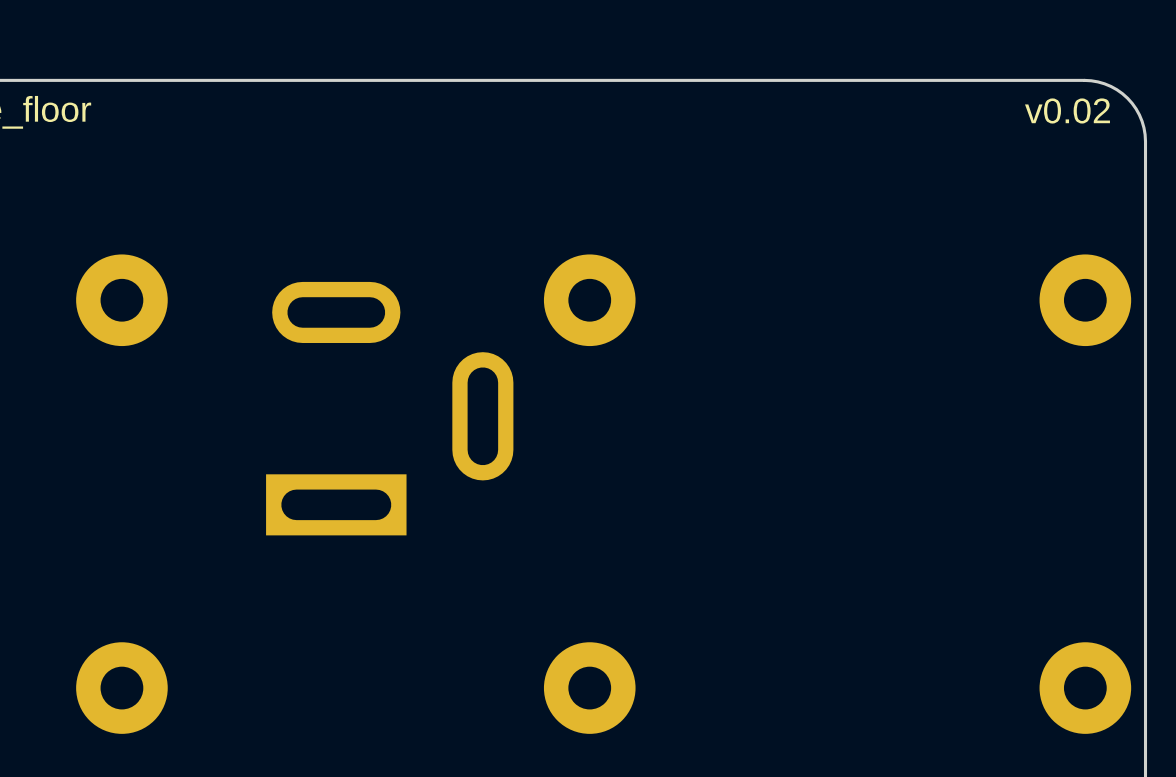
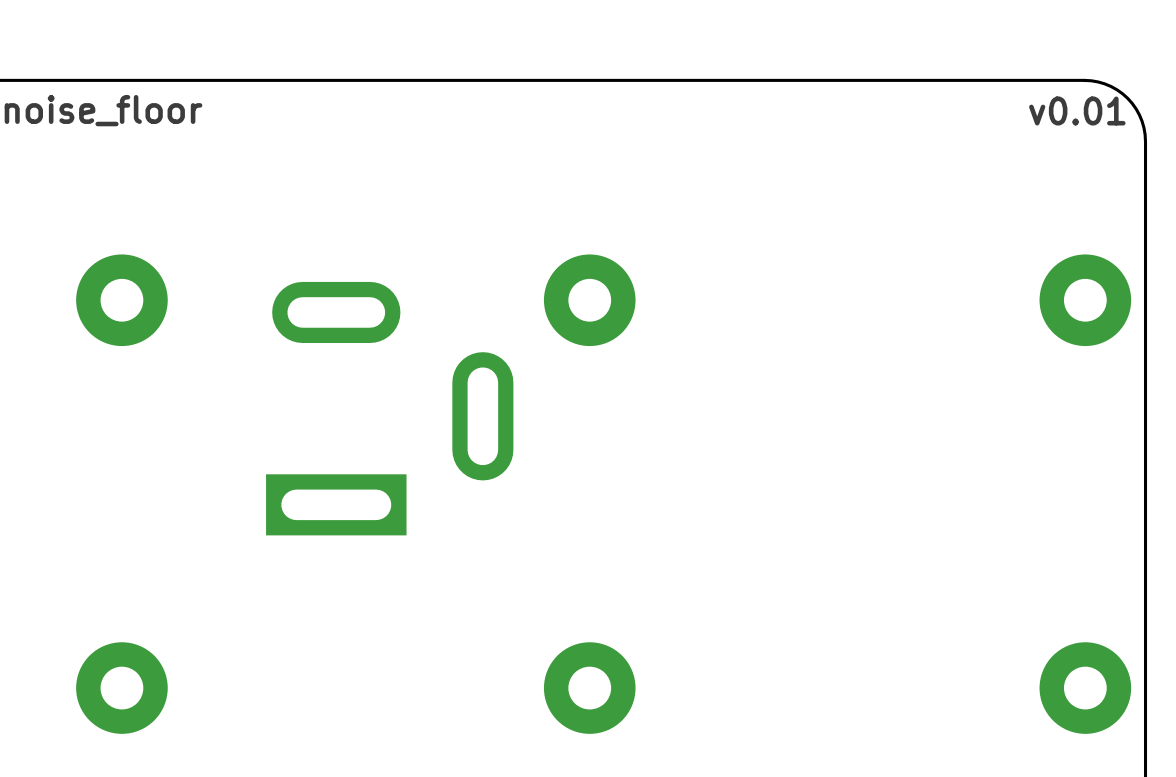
text: v0.02 (1067, 110) -> v0.01 (1077, 110)

